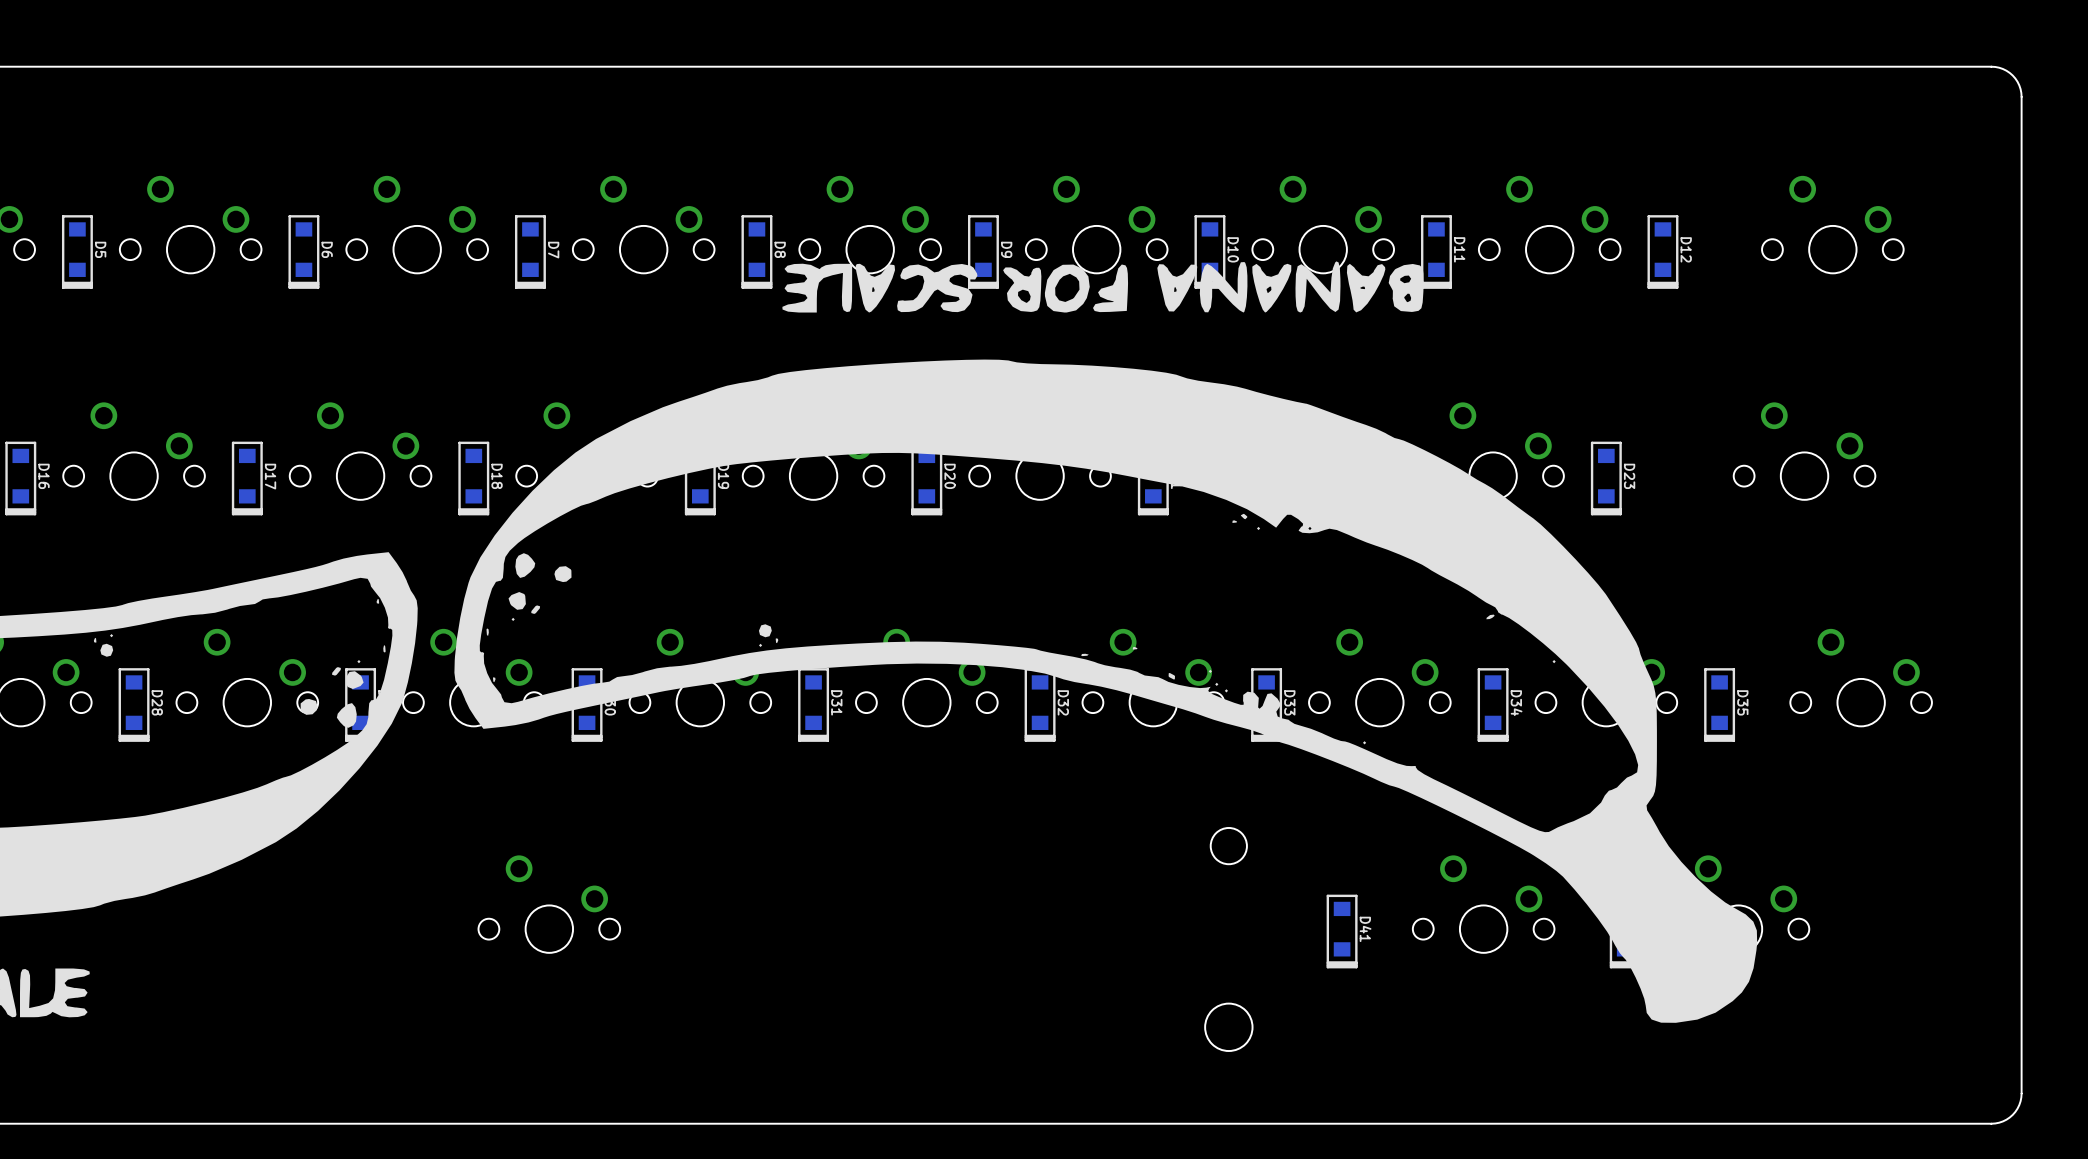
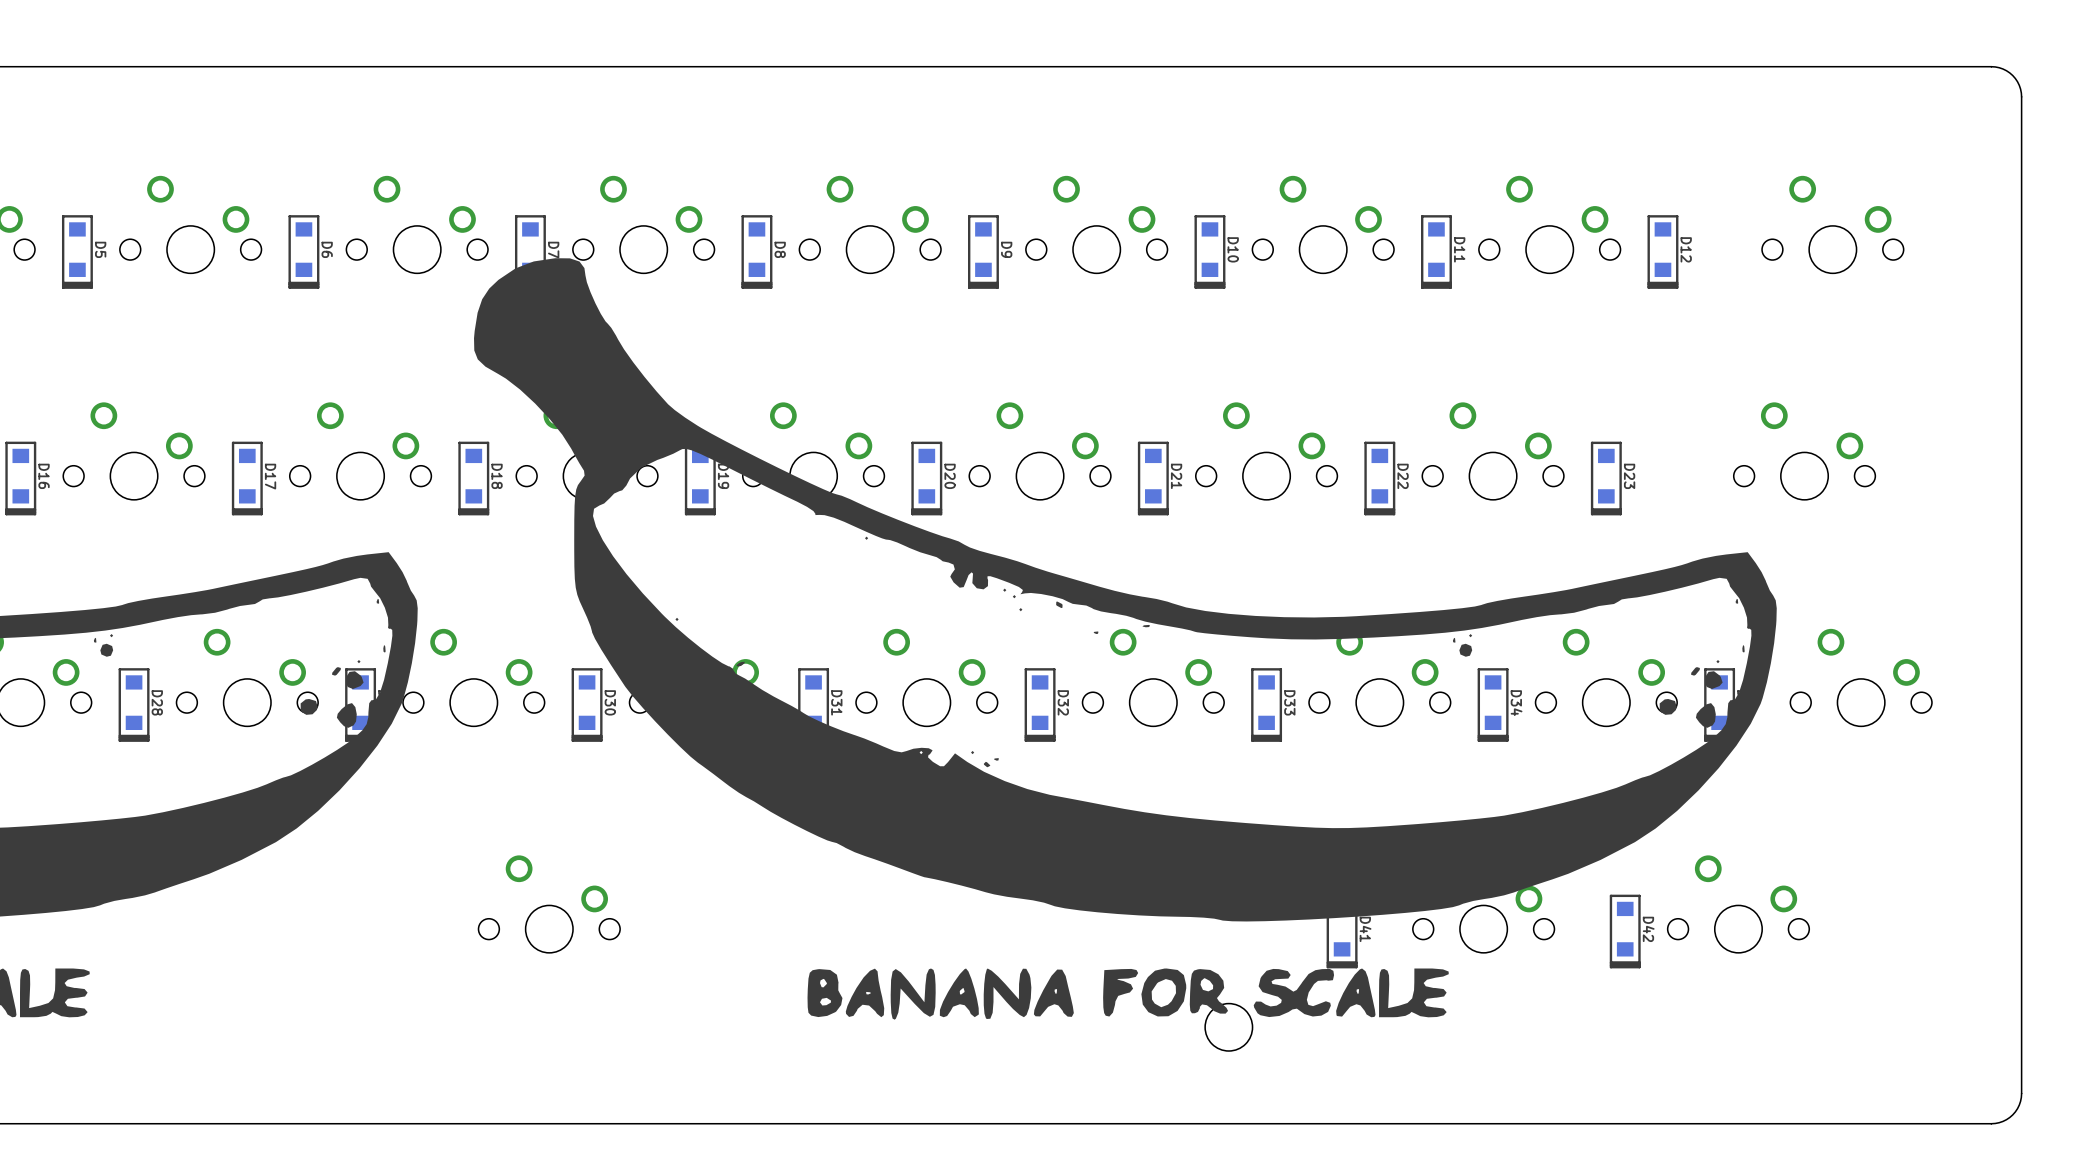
drawing: none -> [474, 258, 1777, 1020]
drawing: [454, 261, 1758, 1023] -> none

